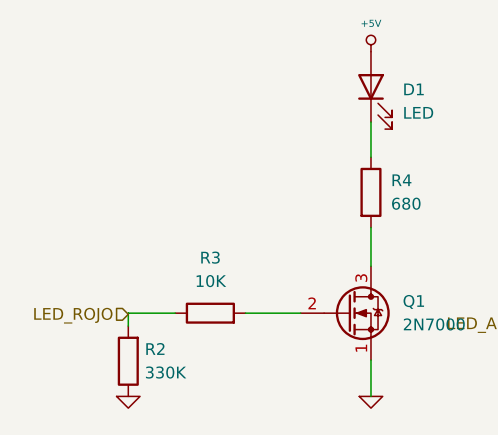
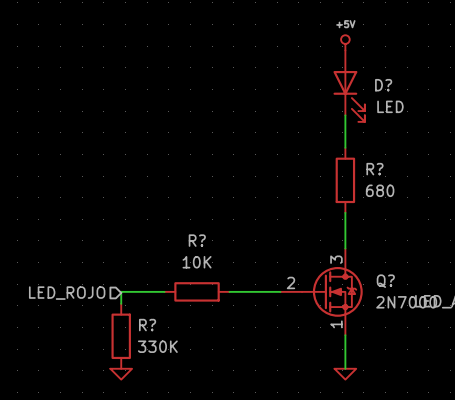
D1 name: D1 (413, 89) -> D? (383, 85)
R4 name: R4 (401, 180) -> R? (374, 169)
R3 name: R3 (210, 257) -> R? (197, 240)
Q1 name: Q1 (413, 301) -> Q? (385, 281)
R2 name: R2 (155, 348) -> R? (147, 325)

